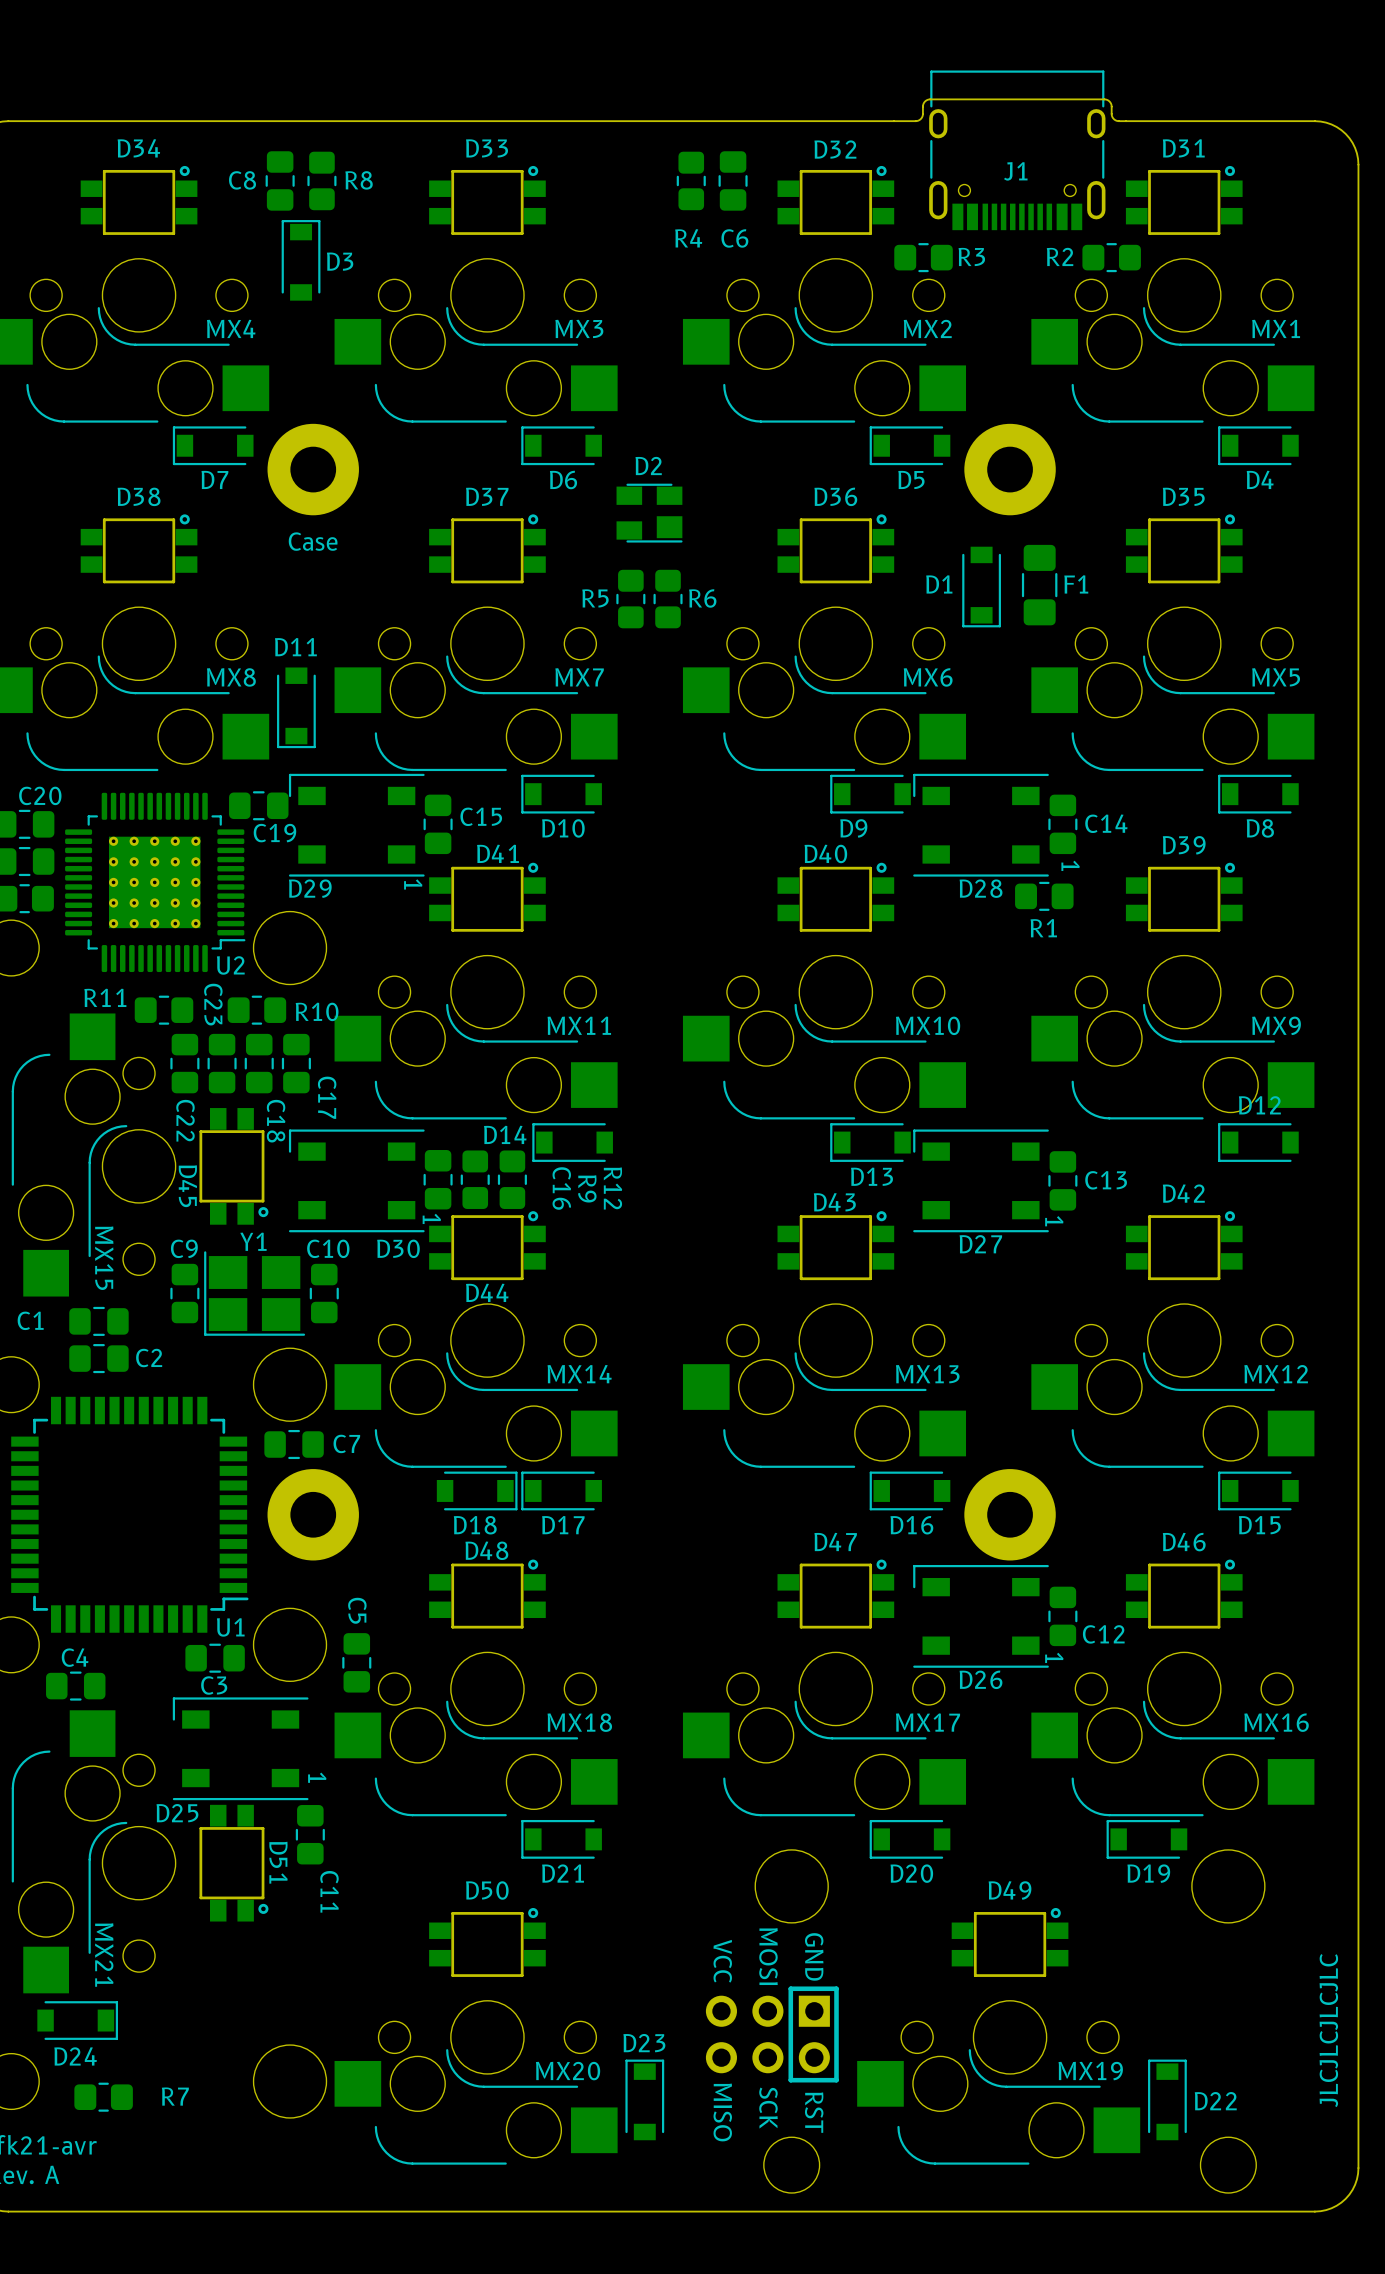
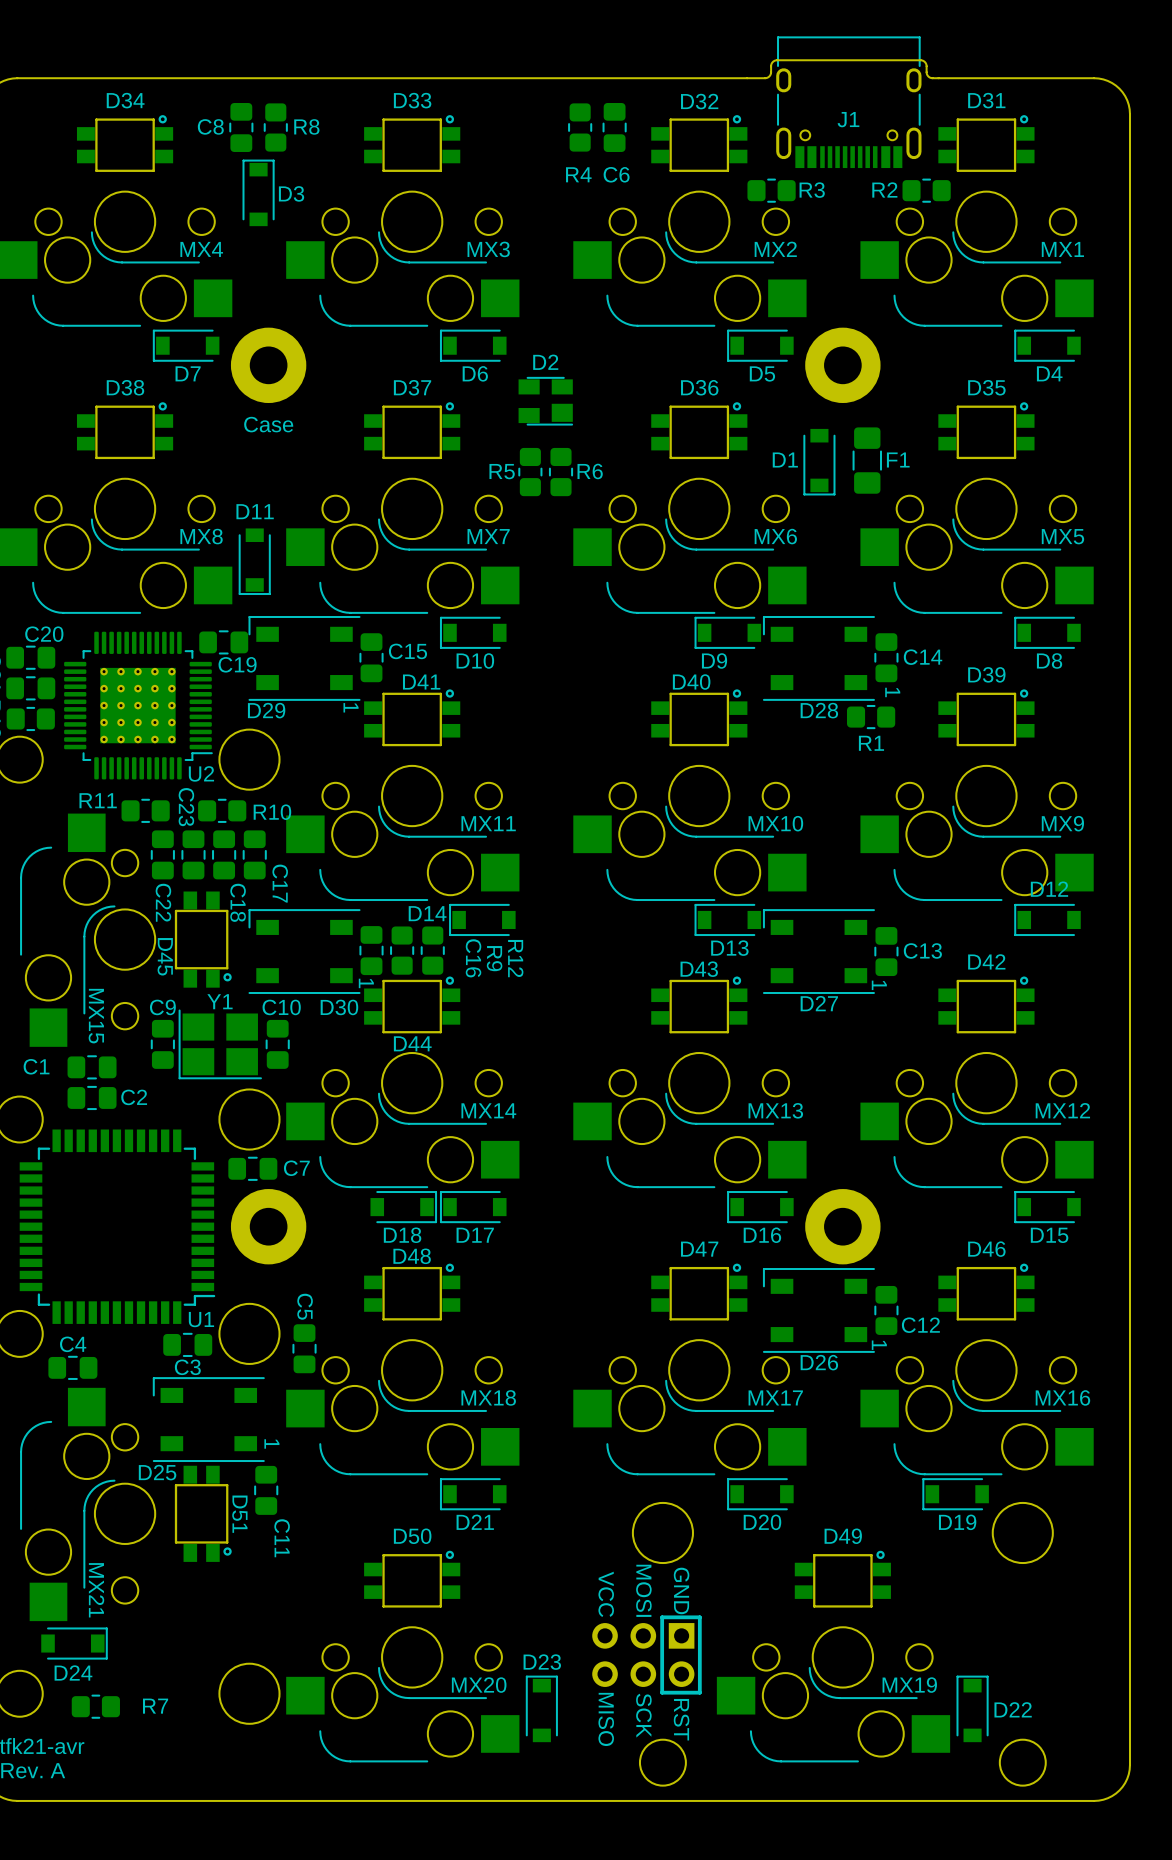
text: JLCJLCJLCJLC (1328, 2030) -> none

